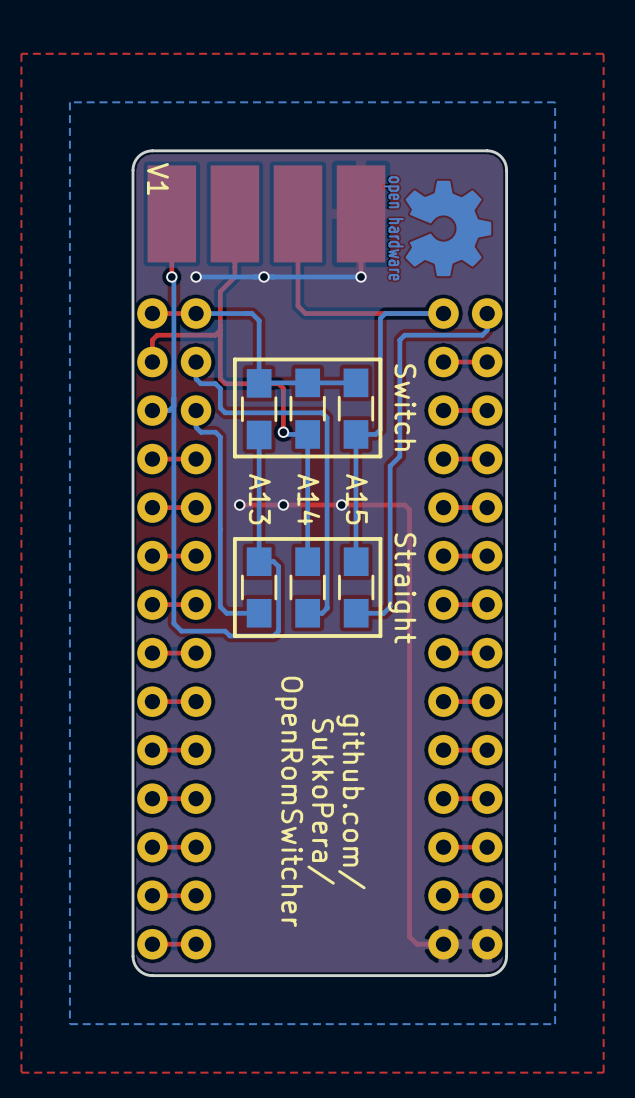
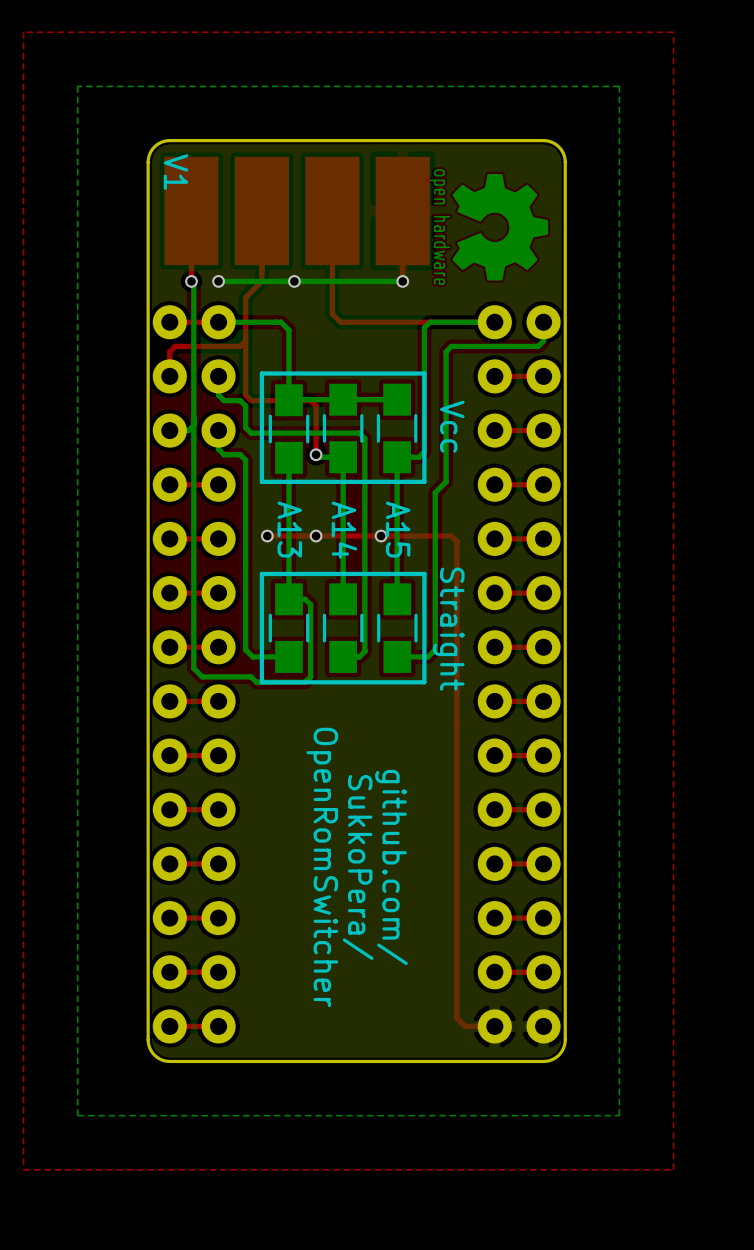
text: Switch (405, 407) -> Vcc (452, 426)

